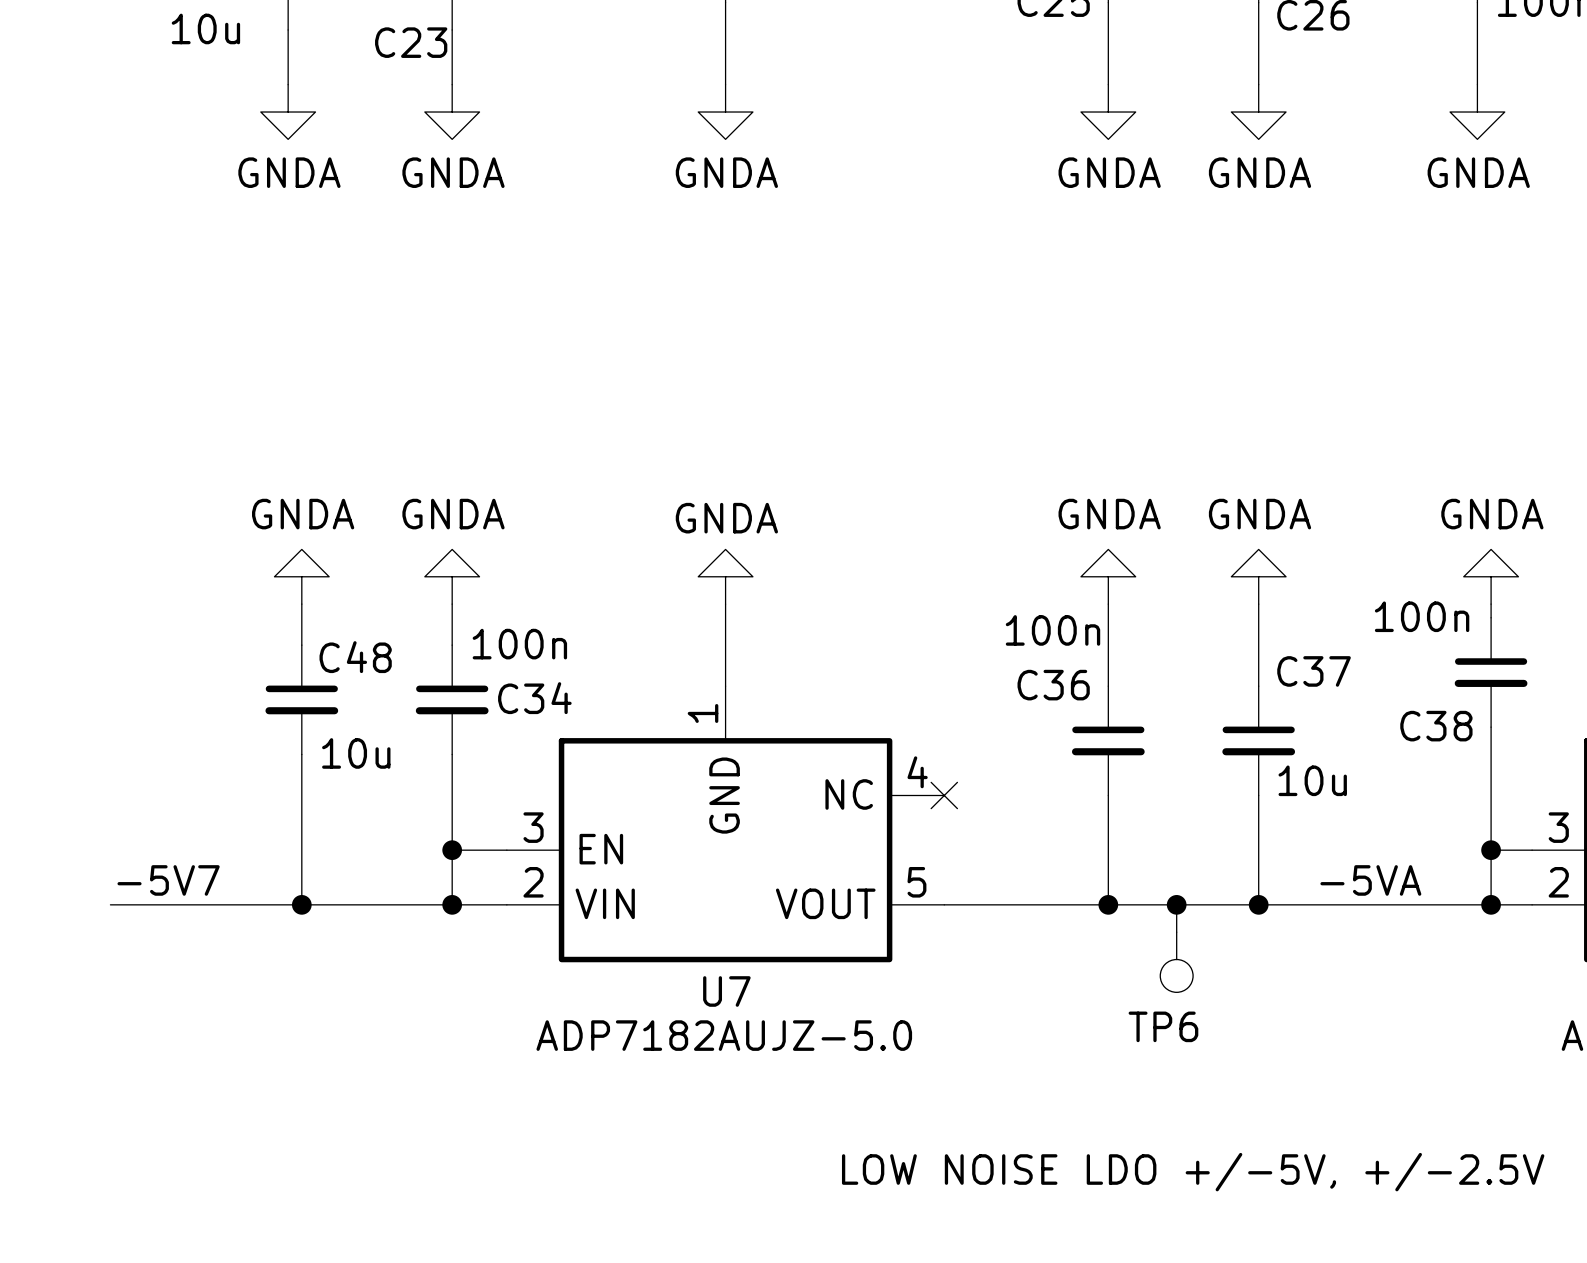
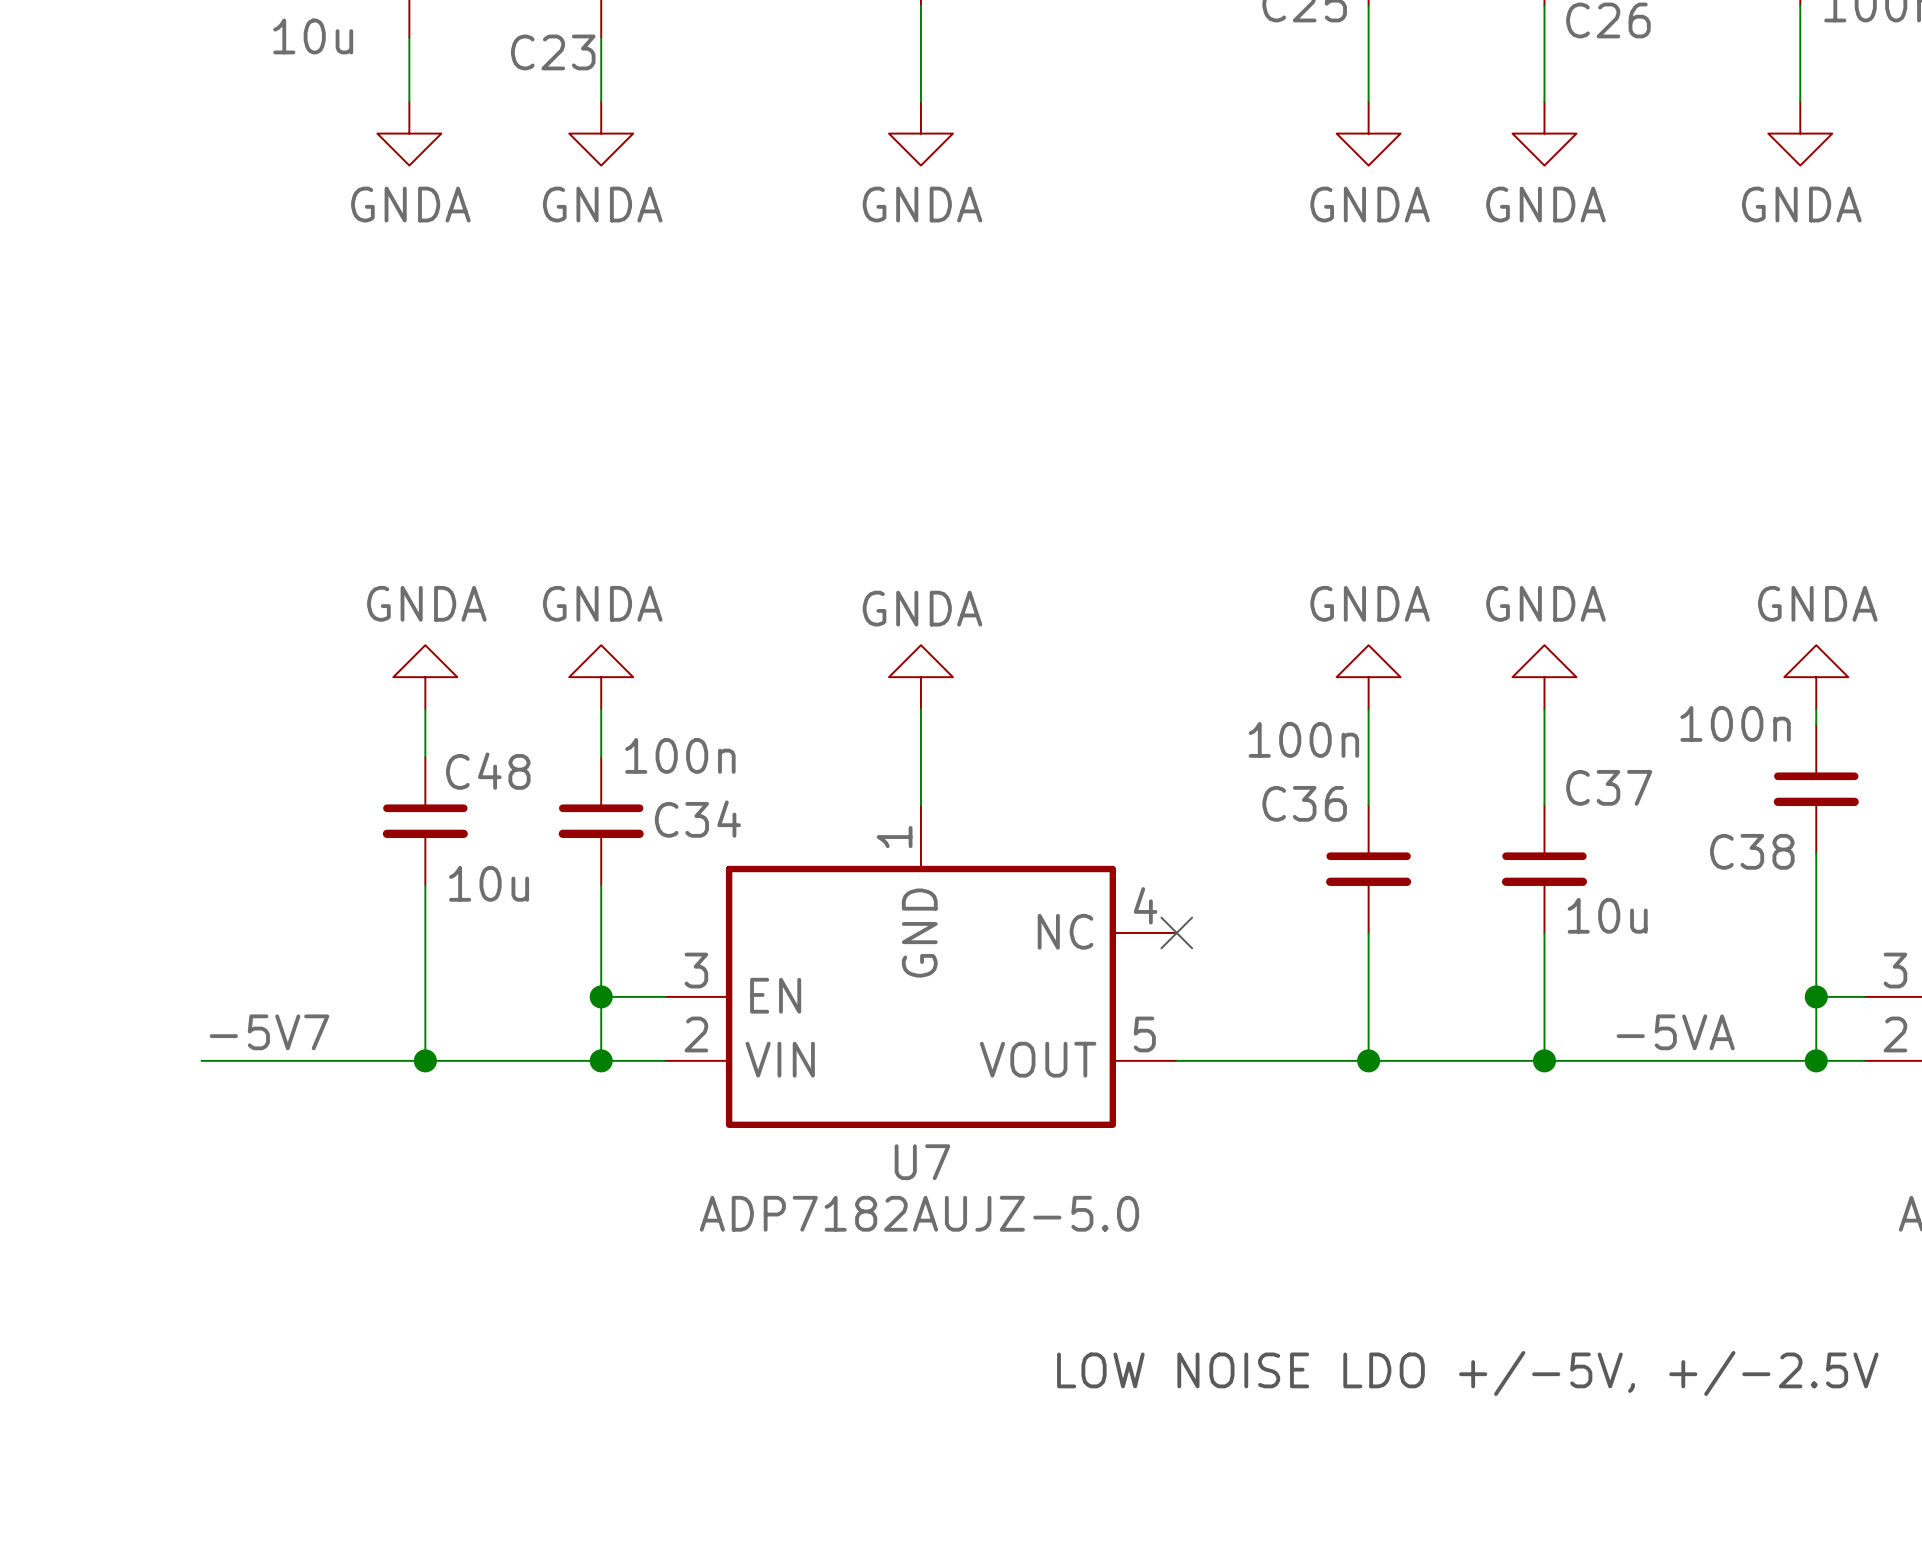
wire: (1176, 904) (1176, 932) -> none
junction: (1176, 904) -> none
TP6: (1176, 962) -> none

